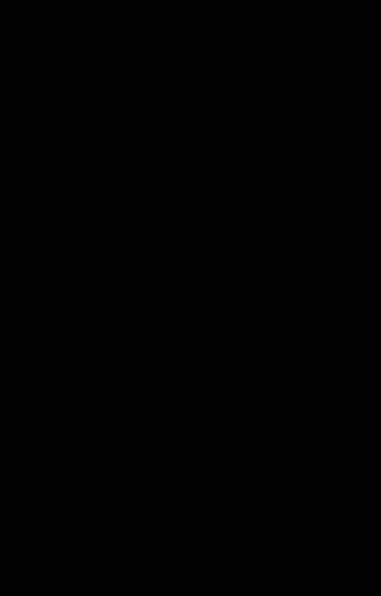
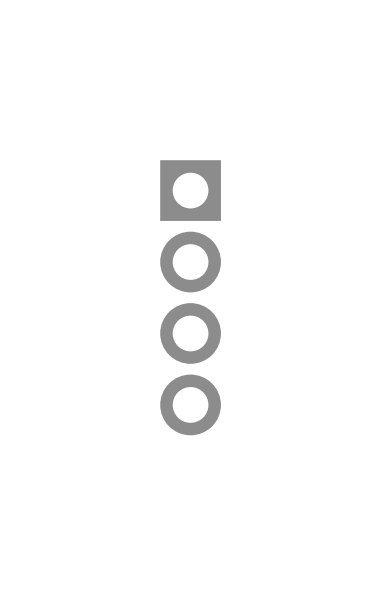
part: none -> (190, 297)

